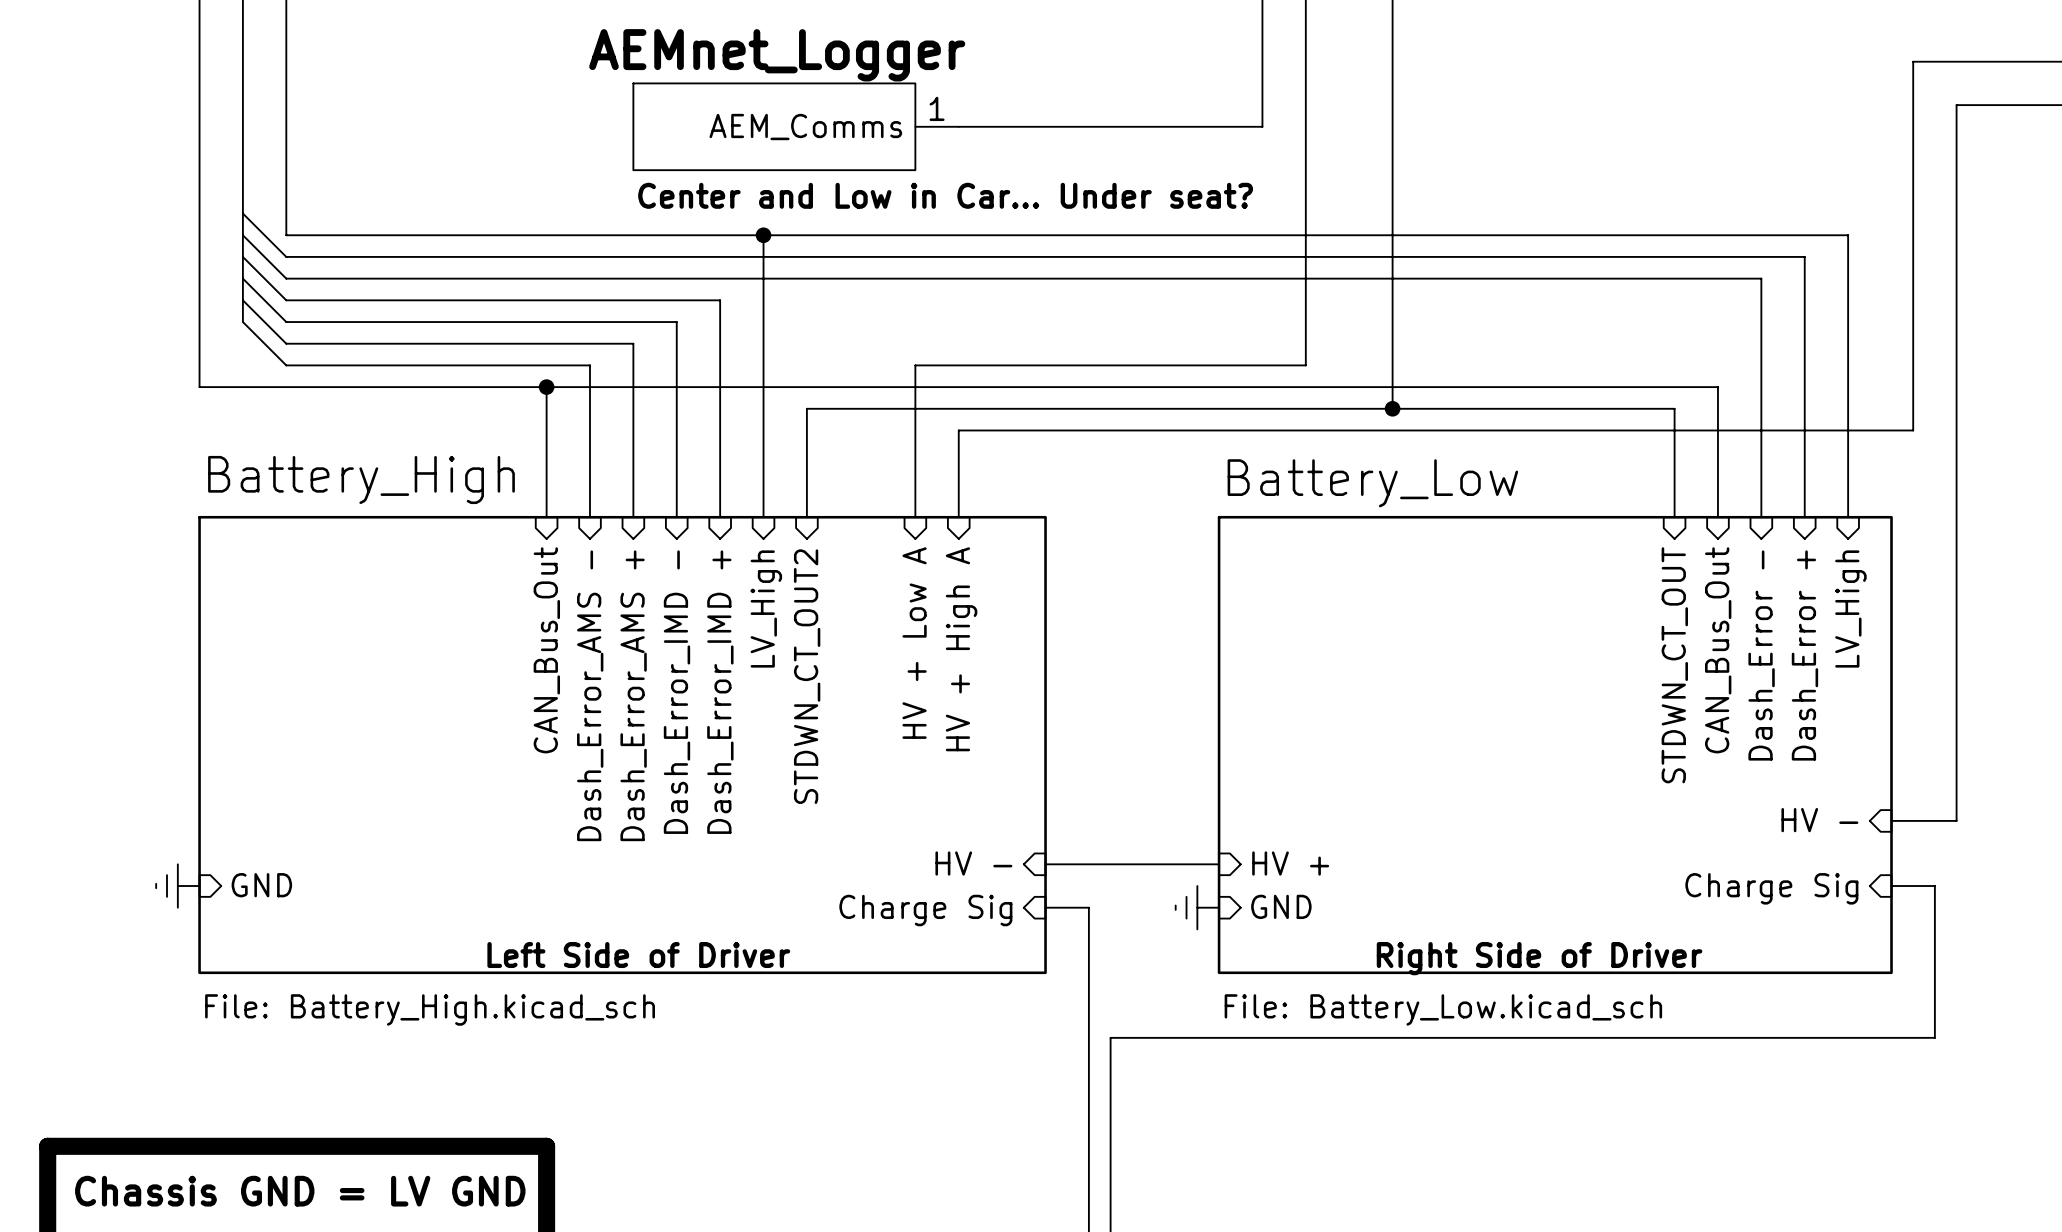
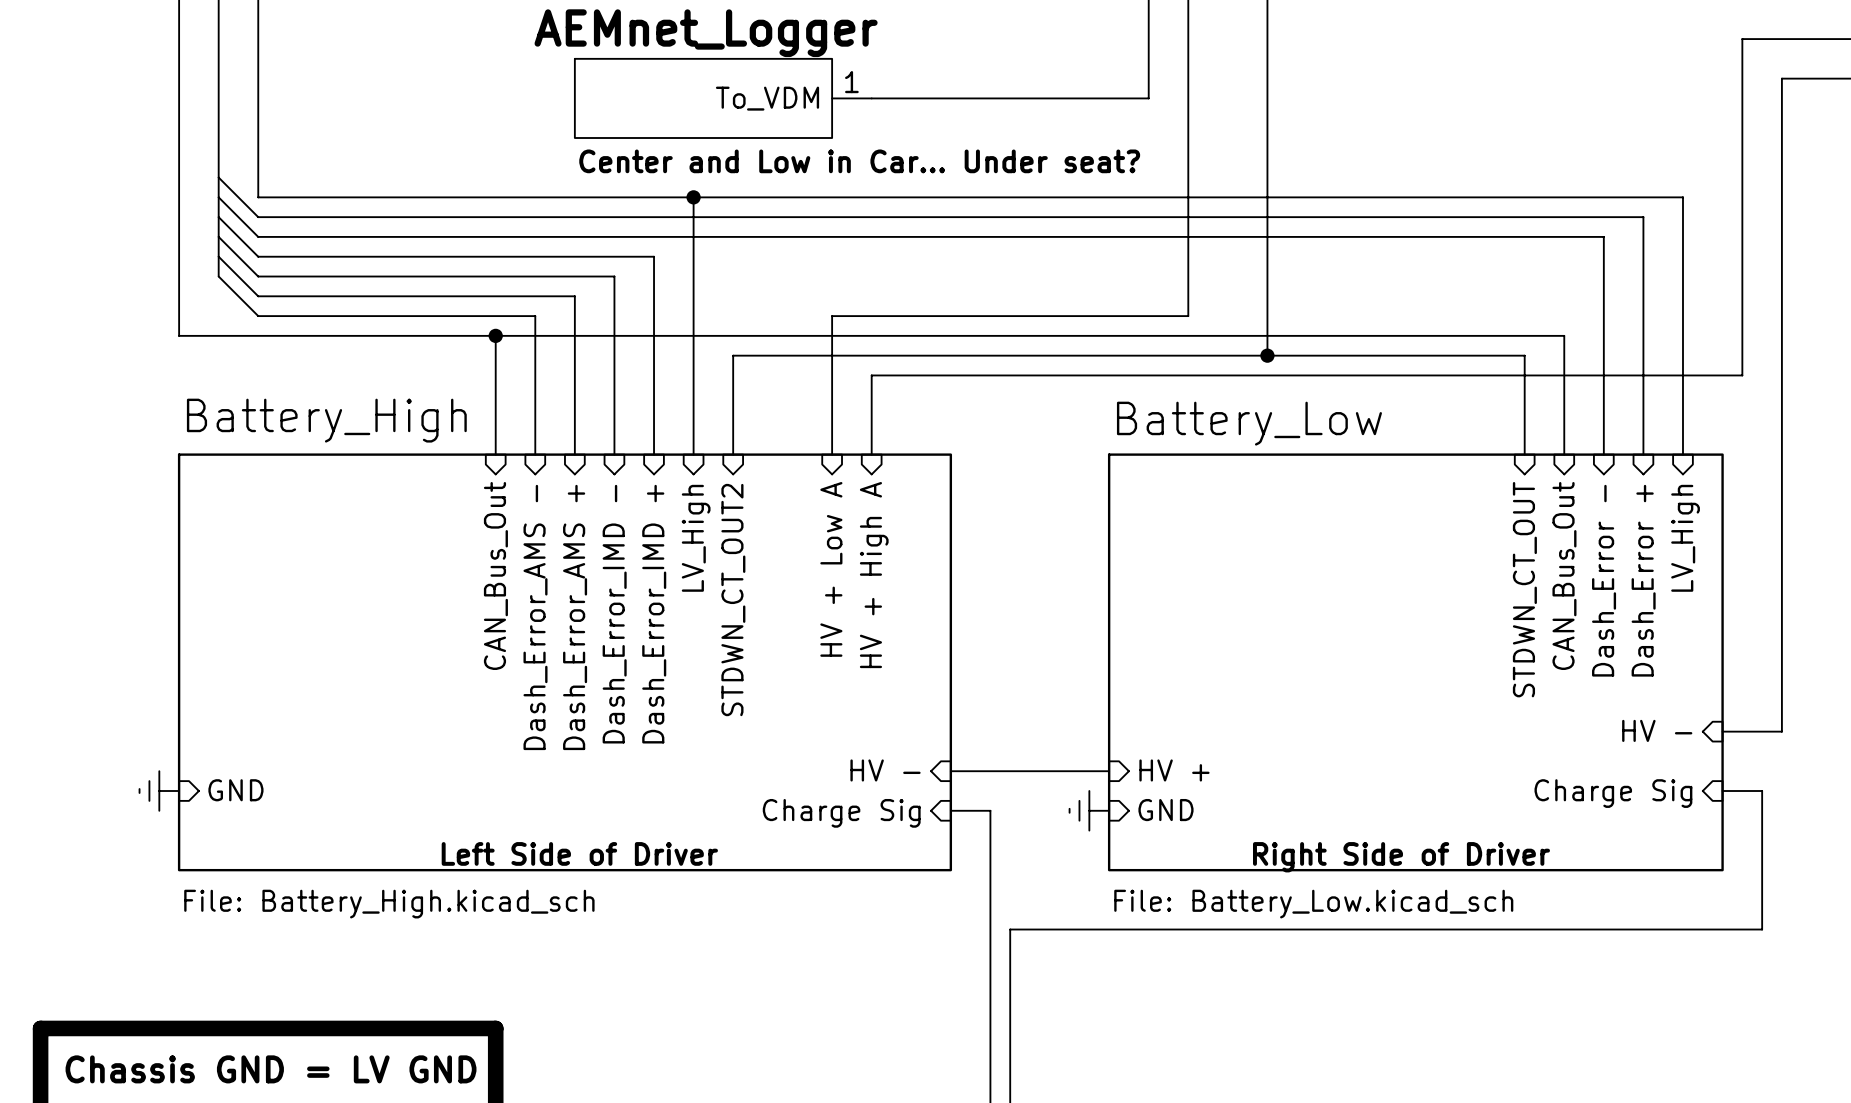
part pin name: AEM_Comms (805, 127) -> To_VDM (767, 98)

